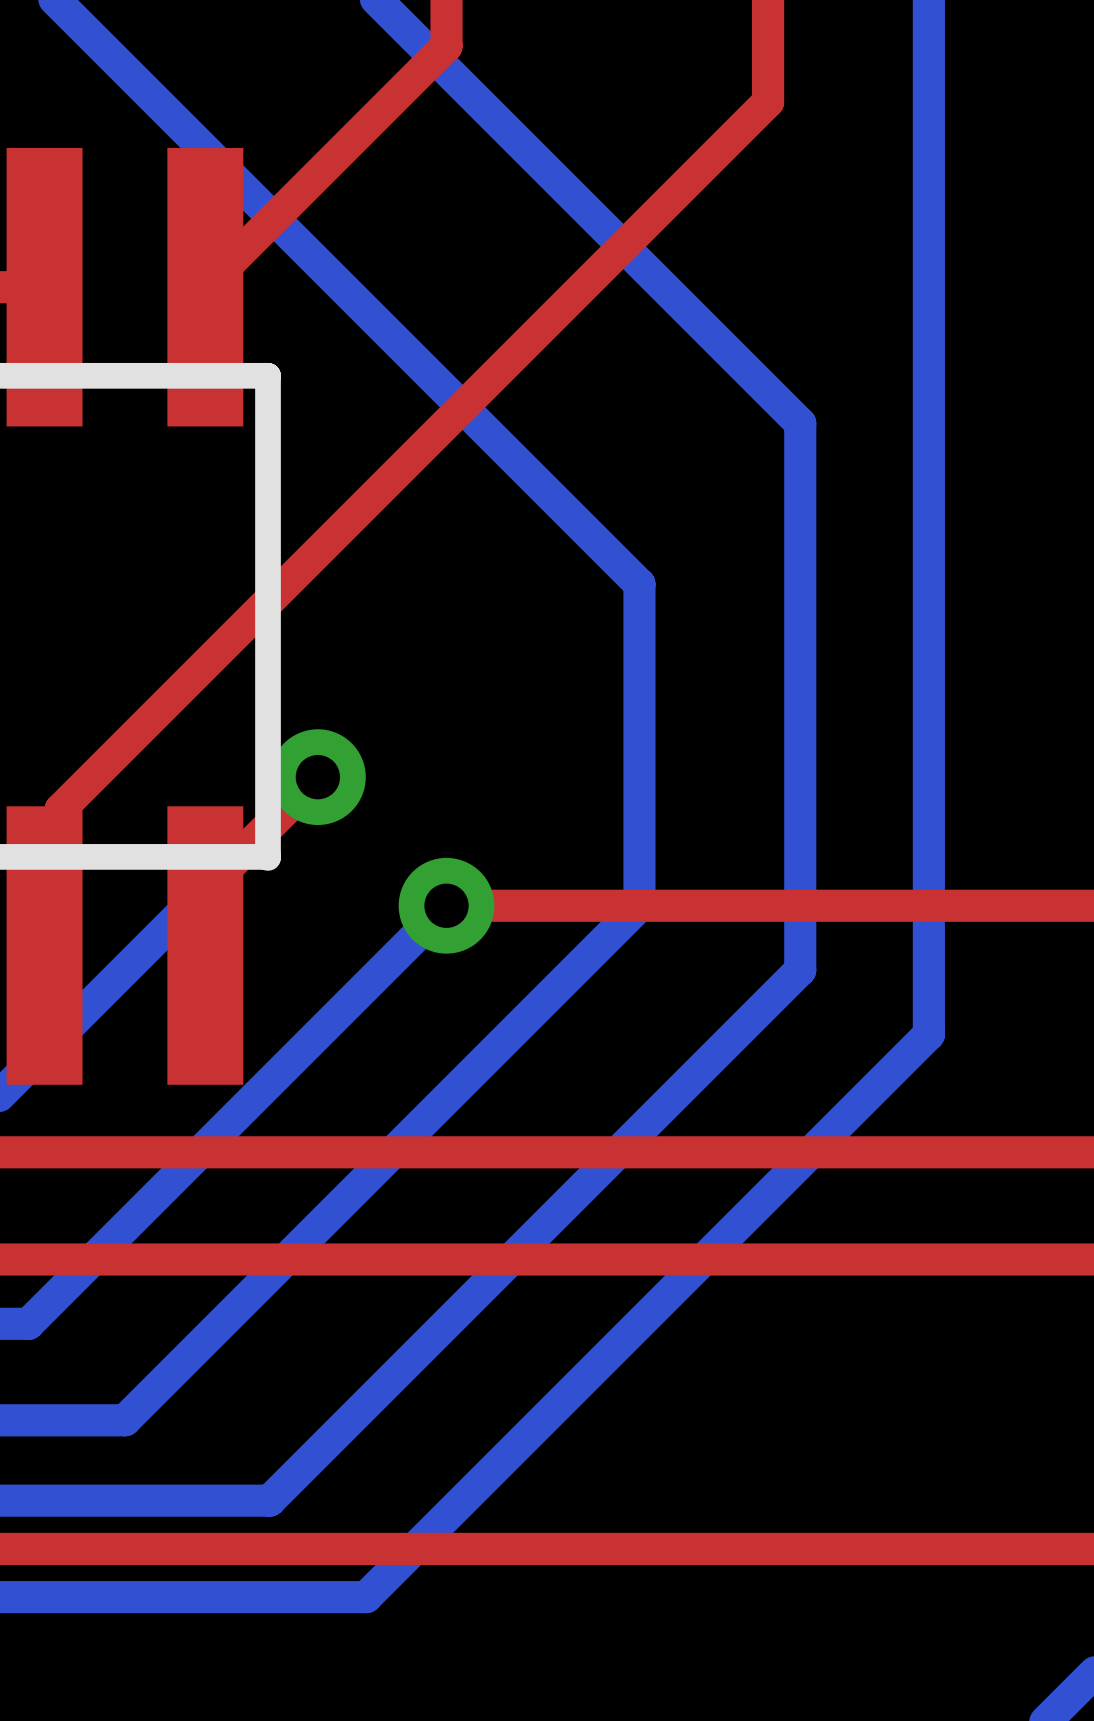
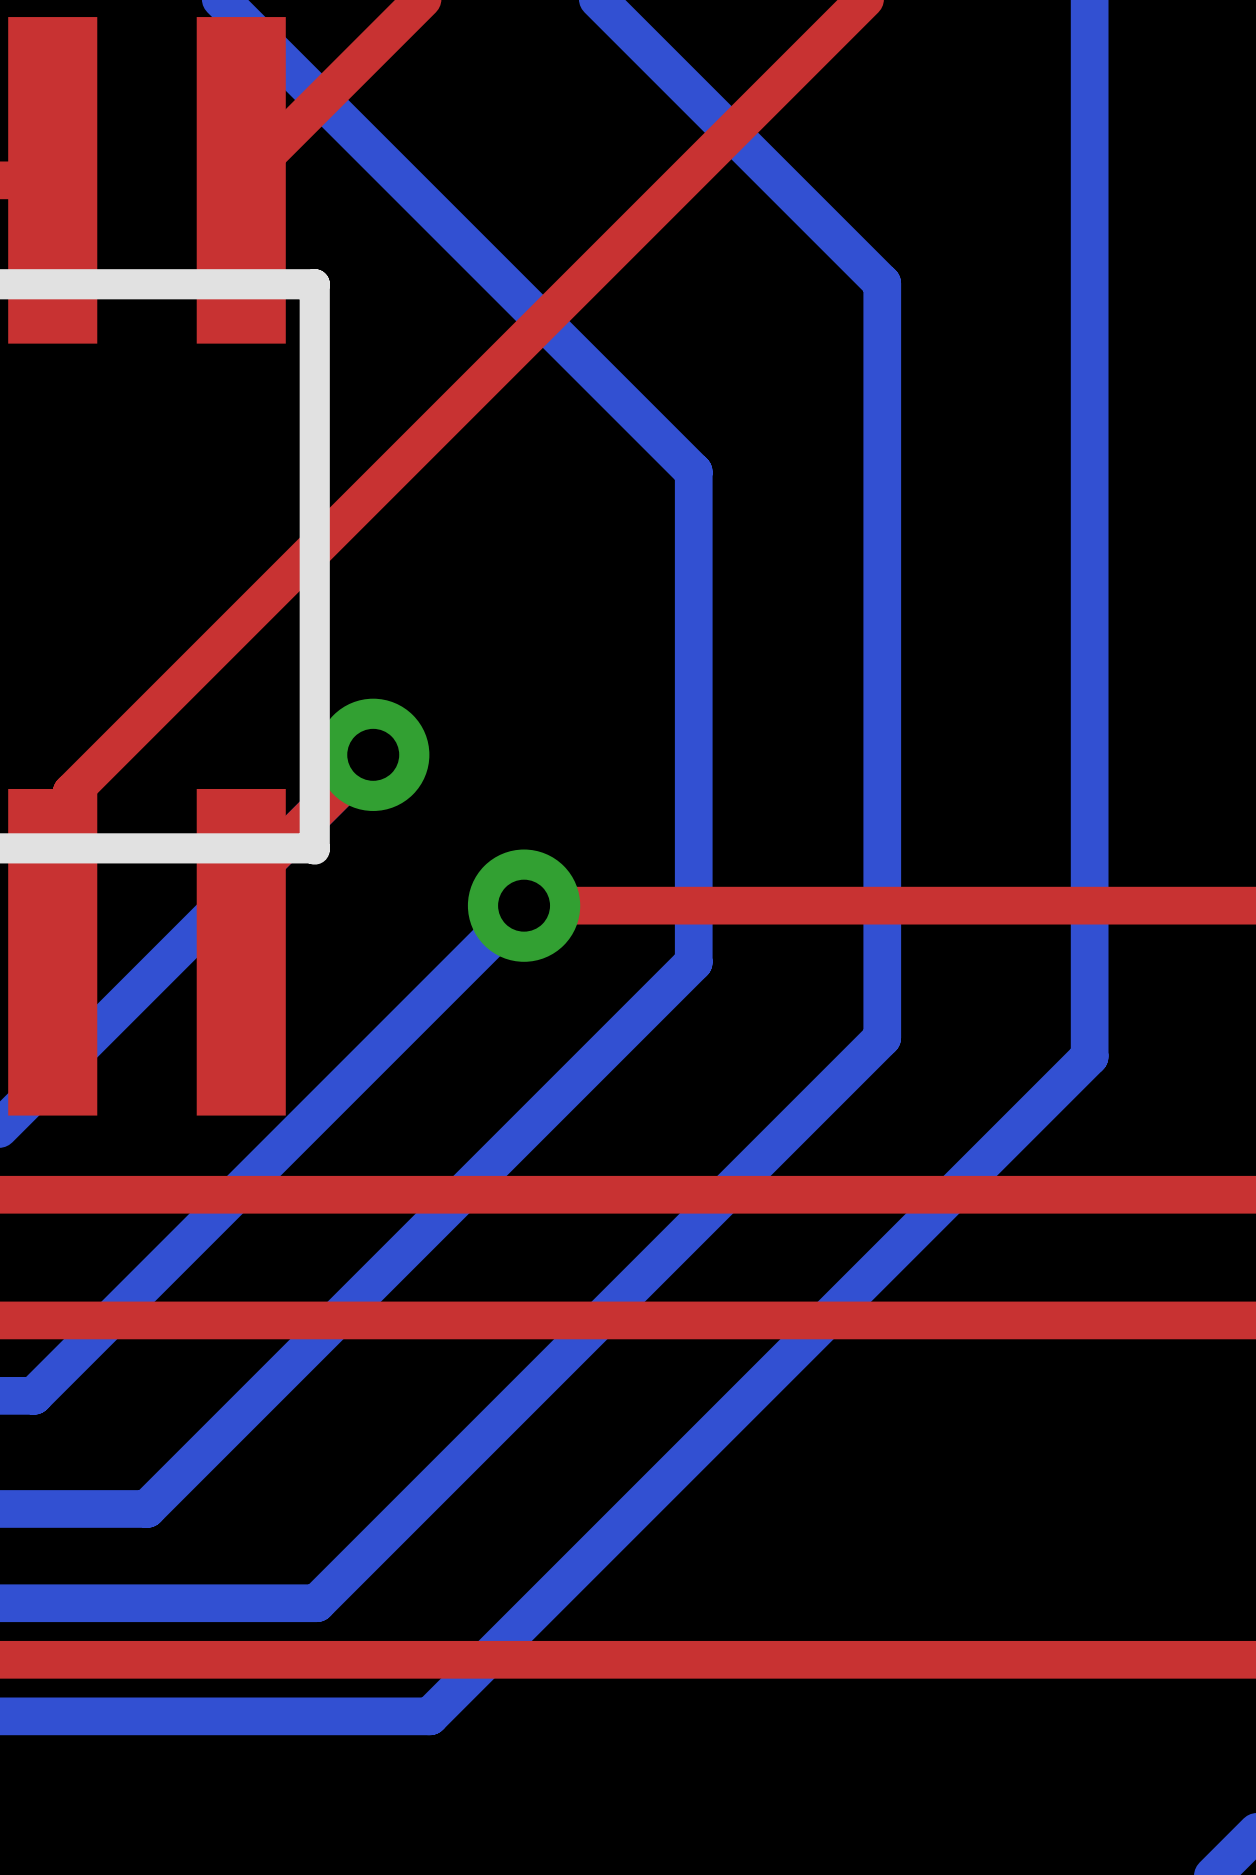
bottom track: (752, 375) (800, 423) (800, 970) (752, 1018) -> (882, 283) (882, 1037)
bottom track: (591, 535) (639, 584) (639, 905) (591, 954) -> (693, 472) (693, 962)

